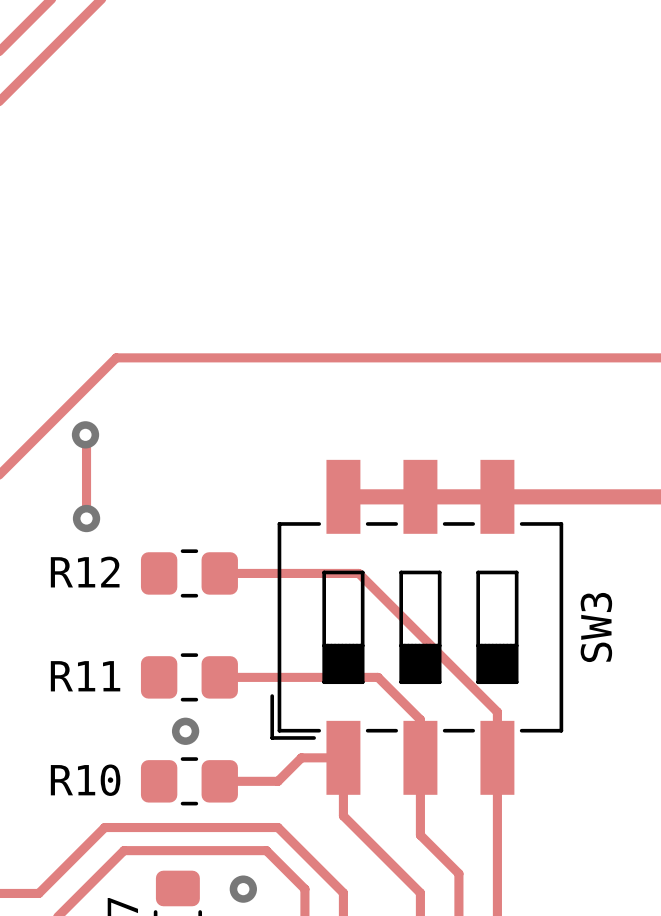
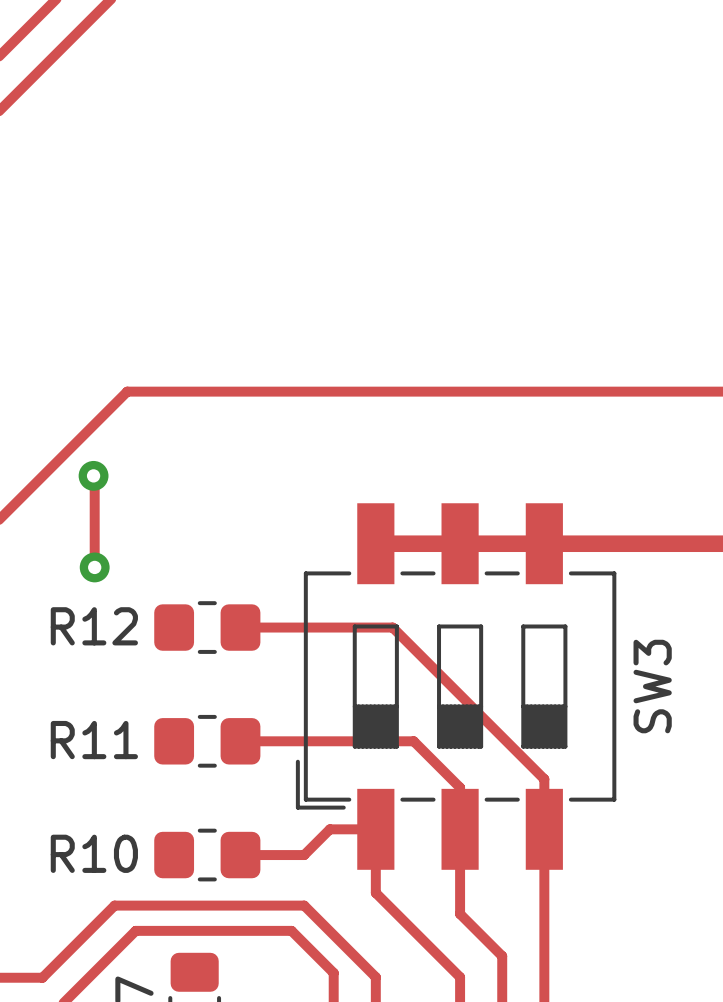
via: (185, 731) -> none
via: (243, 889) -> none

